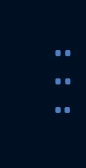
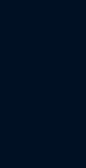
part: (62, 53) -> none
part: (62, 81) -> none
part: (62, 109) -> none

